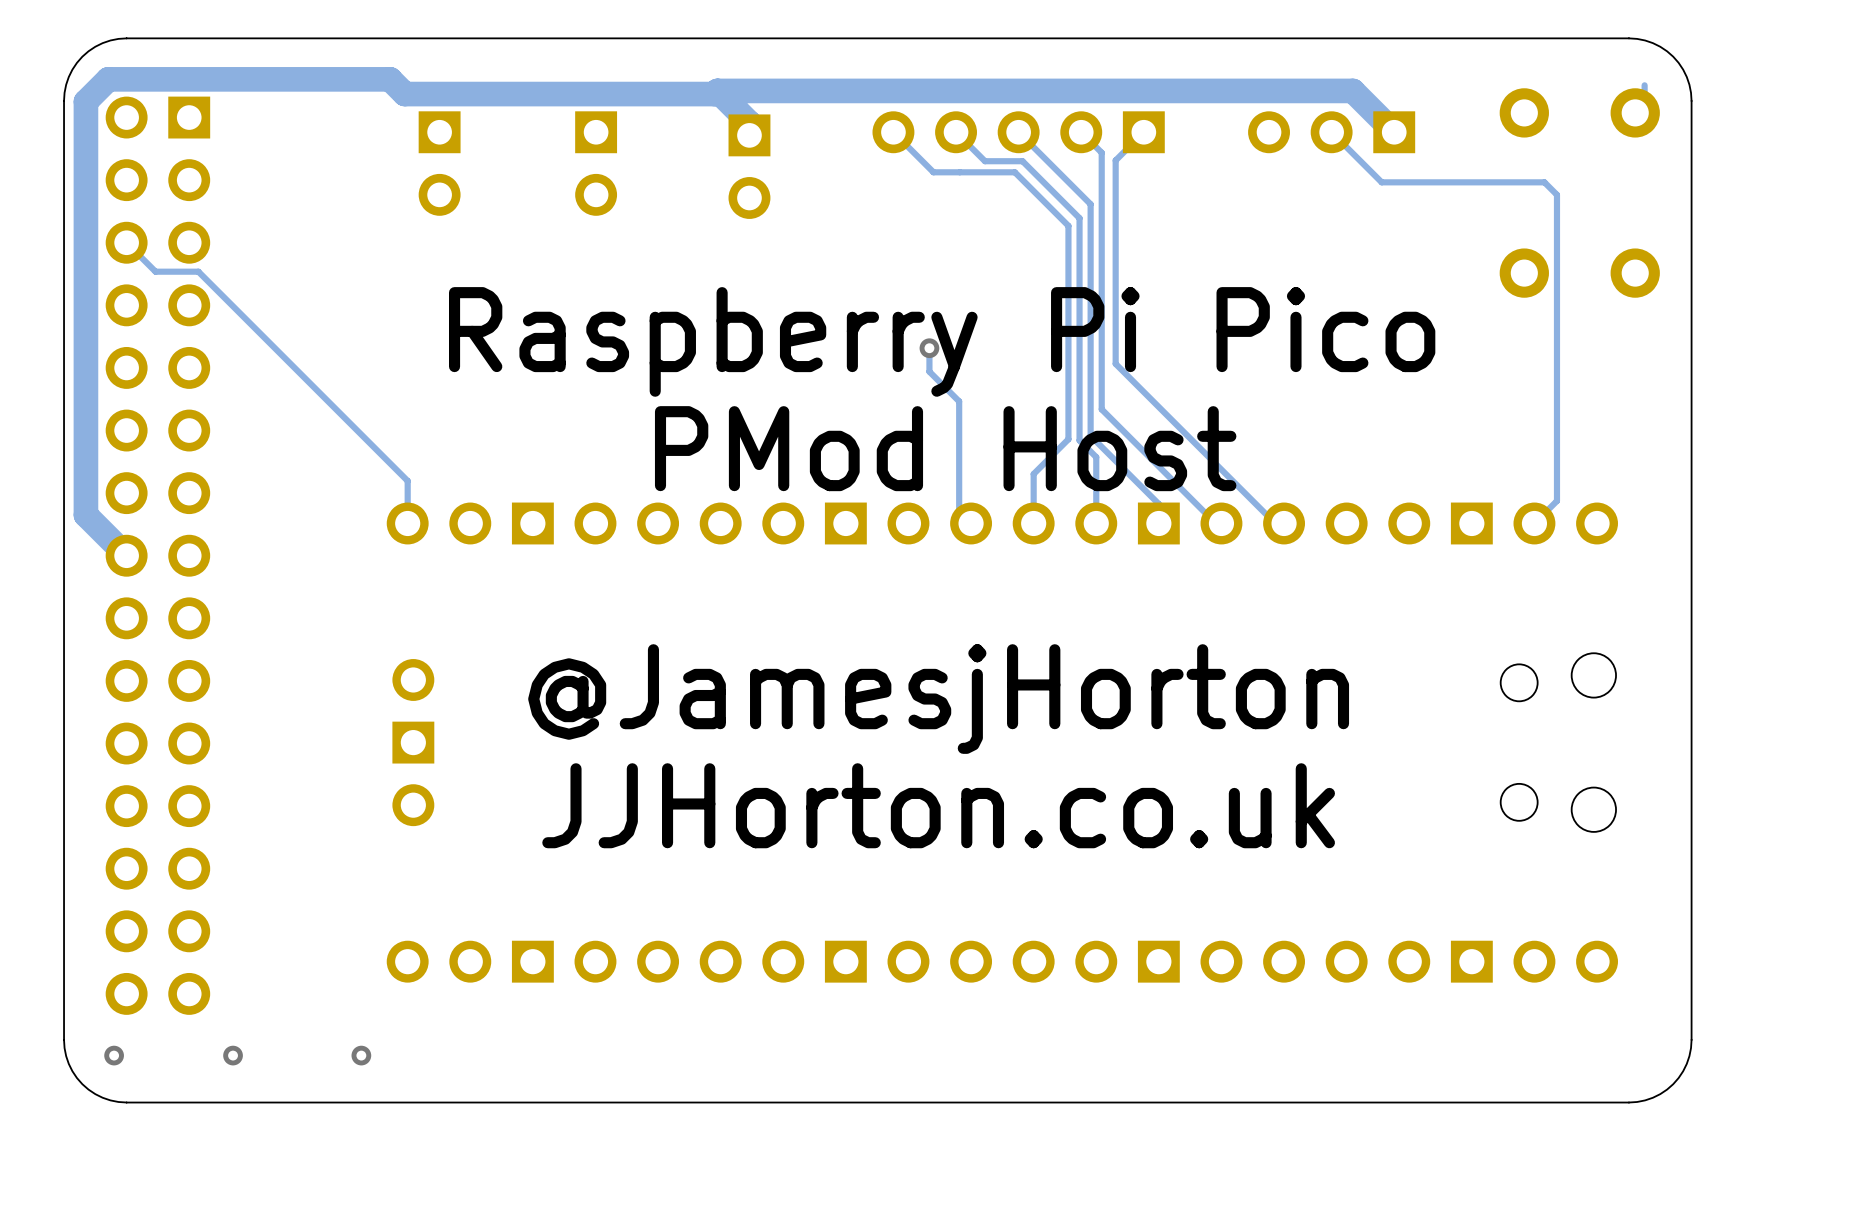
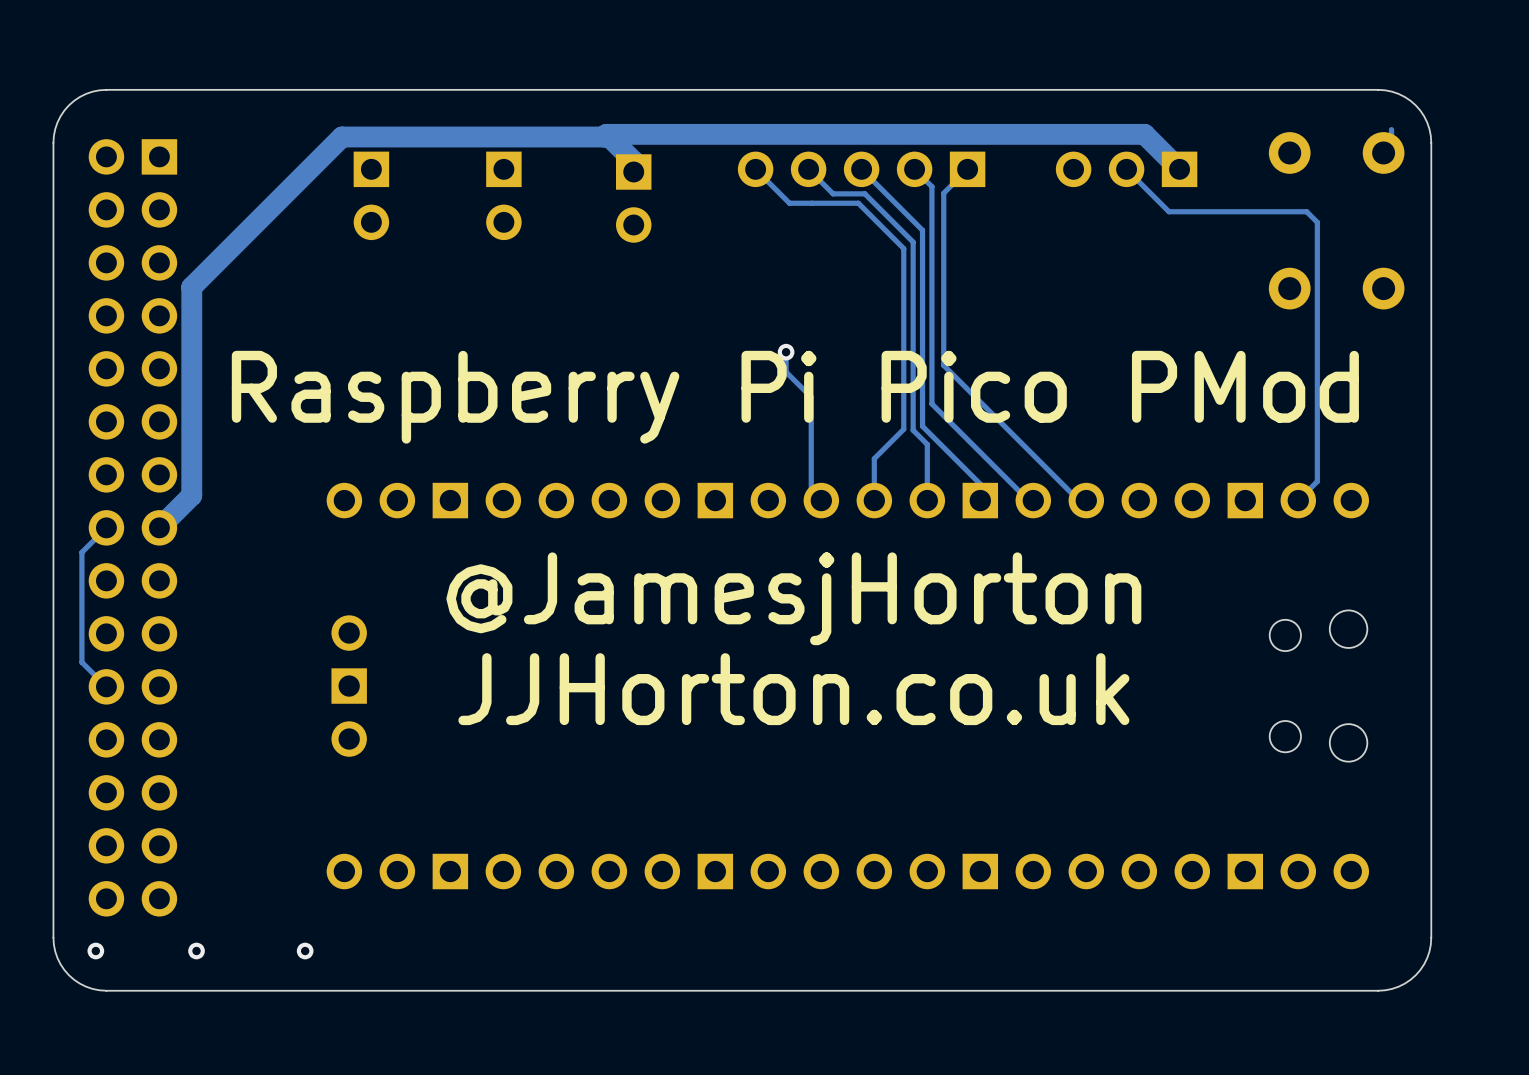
track: (404, 94) (390, 79) (108, 79) (85, 101) (85, 515) (126, 555) -> (341, 137) (191, 287) (191, 495) (159, 527)
track: (126, 242) (155, 271) (198, 271) (407, 480) (407, 523) -> none
text: Raspberry Pi Pico (942, 341) -> Raspberry Pi Pico PMod (795, 397)
text: PMod Host (945, 448) -> none
track: none -> (106, 527) (81, 552) (81, 662) (106, 686)
text position: @JamesjHorton (938, 699) -> @JamesjHorton (793, 598)
text position: JJHorton.co.uk (938, 805) -> JJHorton.co.uk (793, 689)

